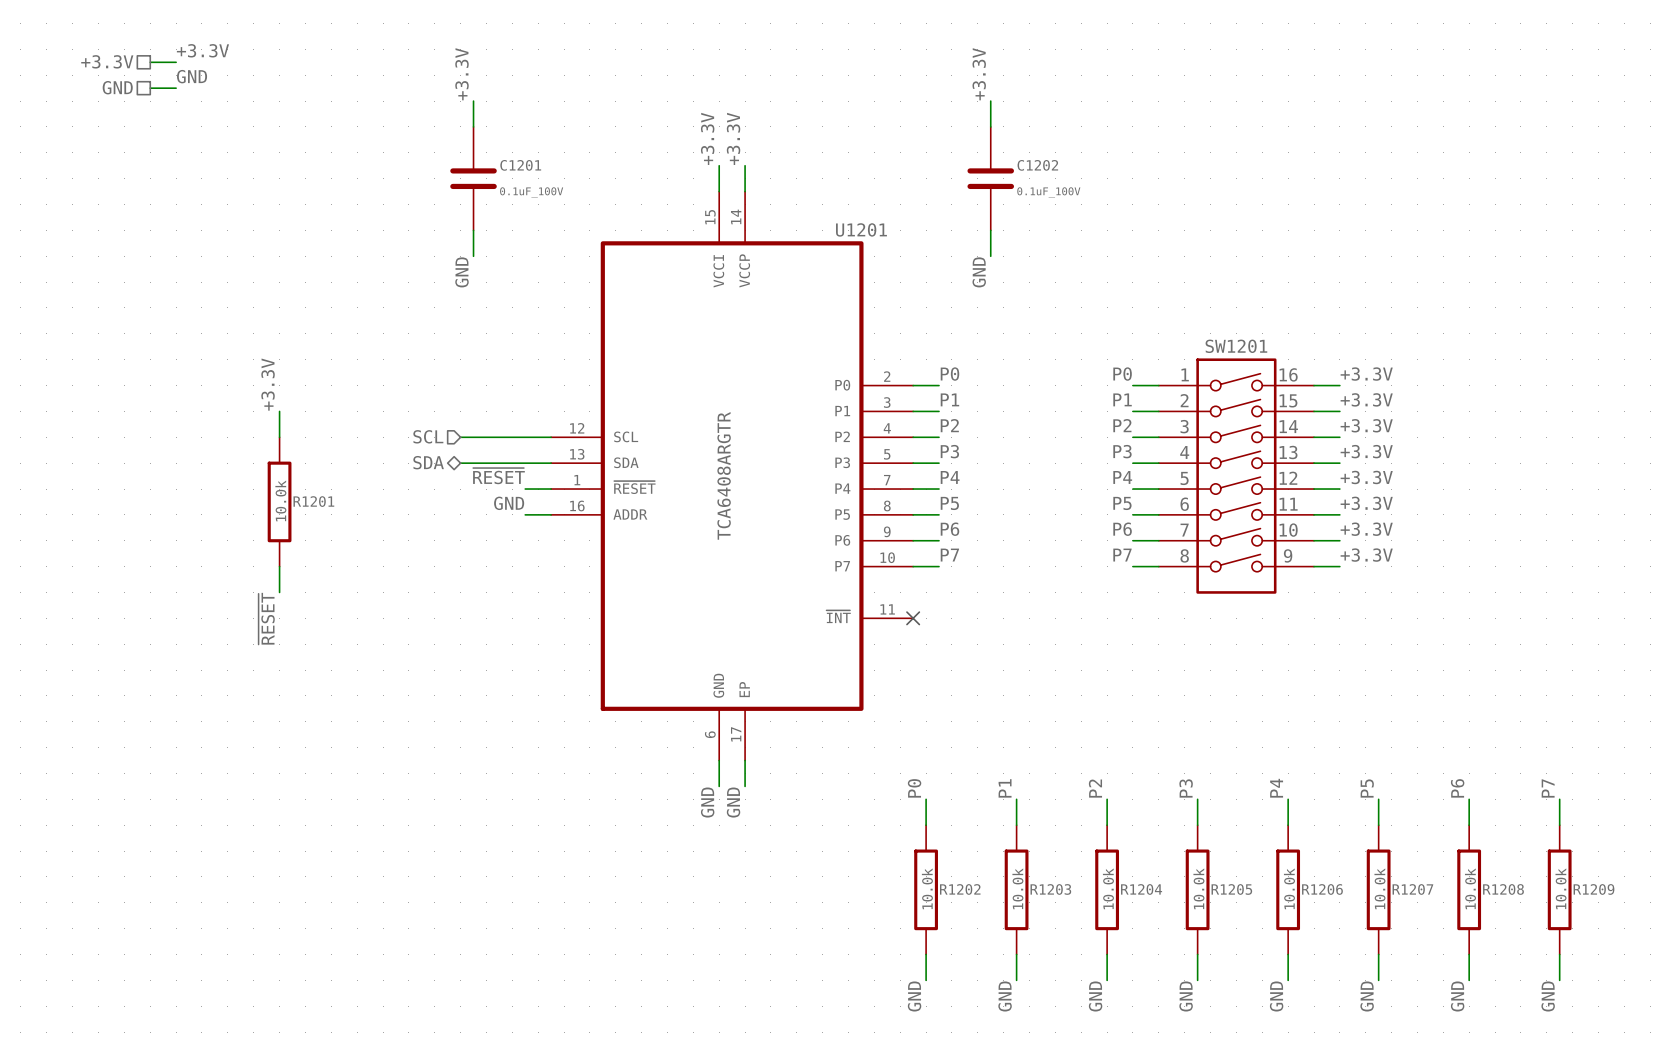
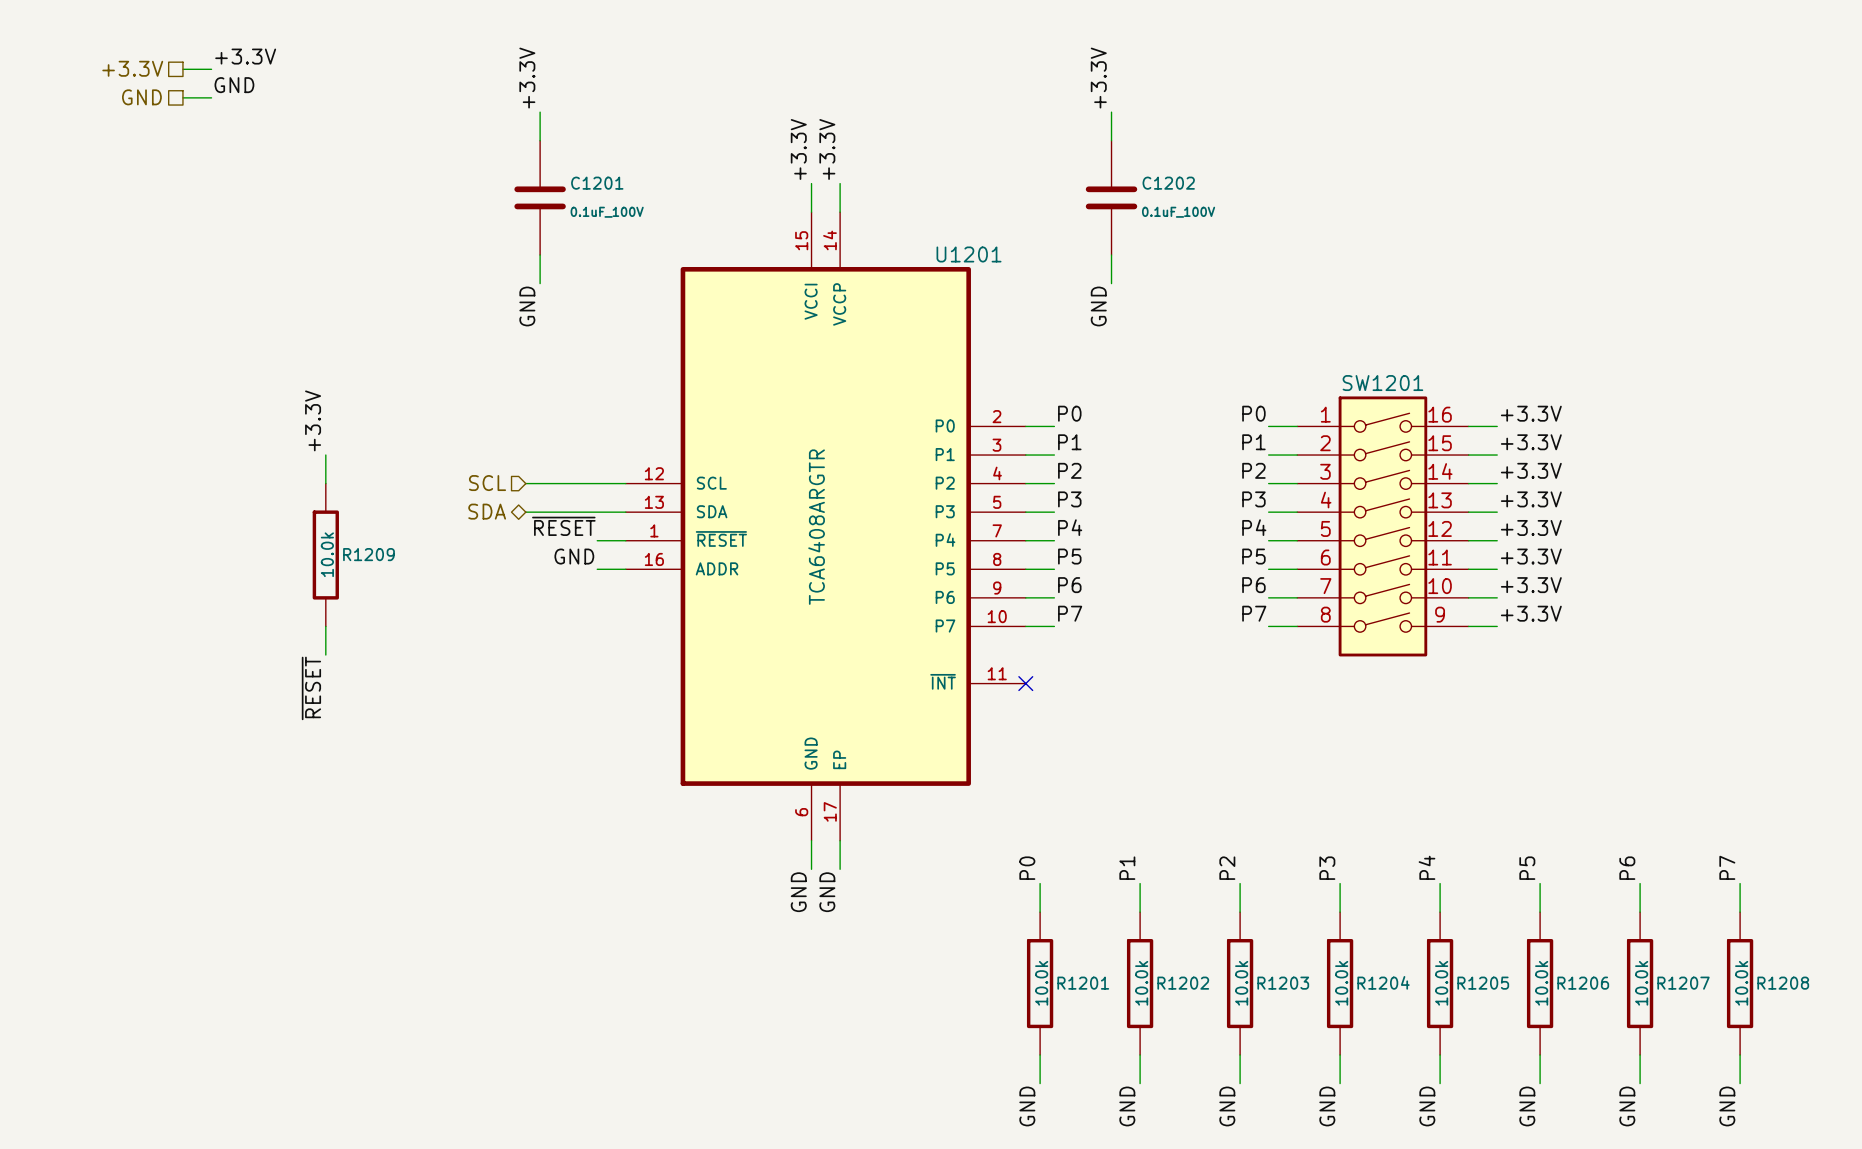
R1201 name: R1201 (313, 501) -> R1209 (368, 554)
R1202 name: R1202 (960, 889) -> R1201 (1083, 983)
R1203 name: R1203 (1050, 889) -> R1202 (1183, 983)
R1204 name: R1204 (1141, 889) -> R1203 (1283, 983)
R1205 name: R1205 (1231, 889) -> R1204 (1383, 982)
R1206 name: R1206 (1322, 889) -> R1205 (1483, 983)
R1207 name: R1207 (1412, 889) -> R1206 (1583, 983)
R1208 name: R1208 (1503, 889) -> R1207 (1683, 983)
R1209 name: R1209 (1593, 889) -> R1208 (1783, 983)

